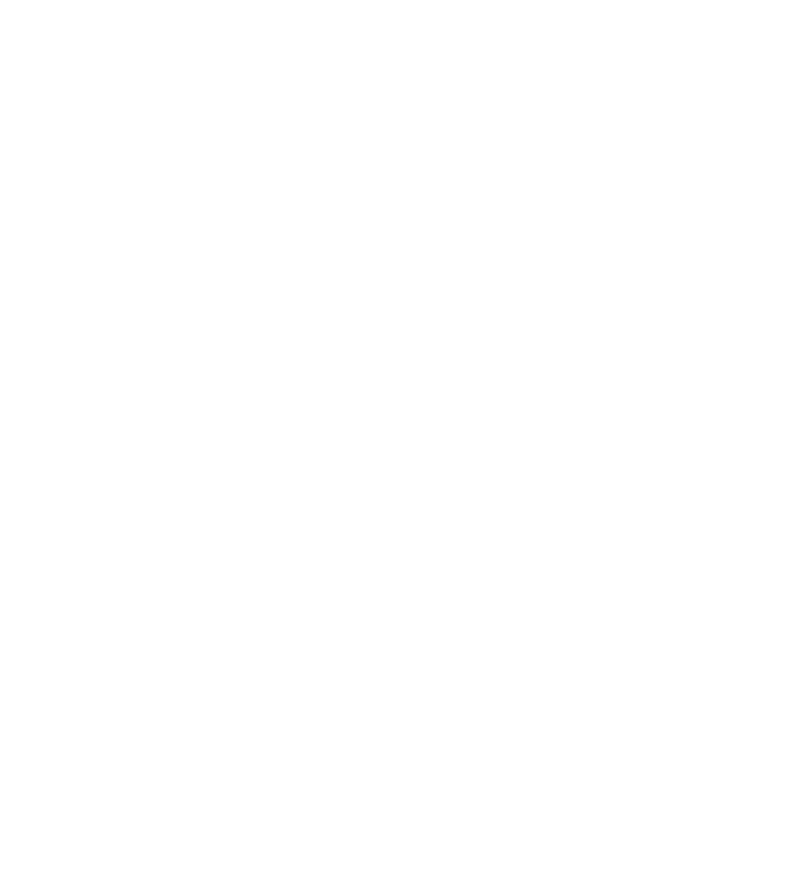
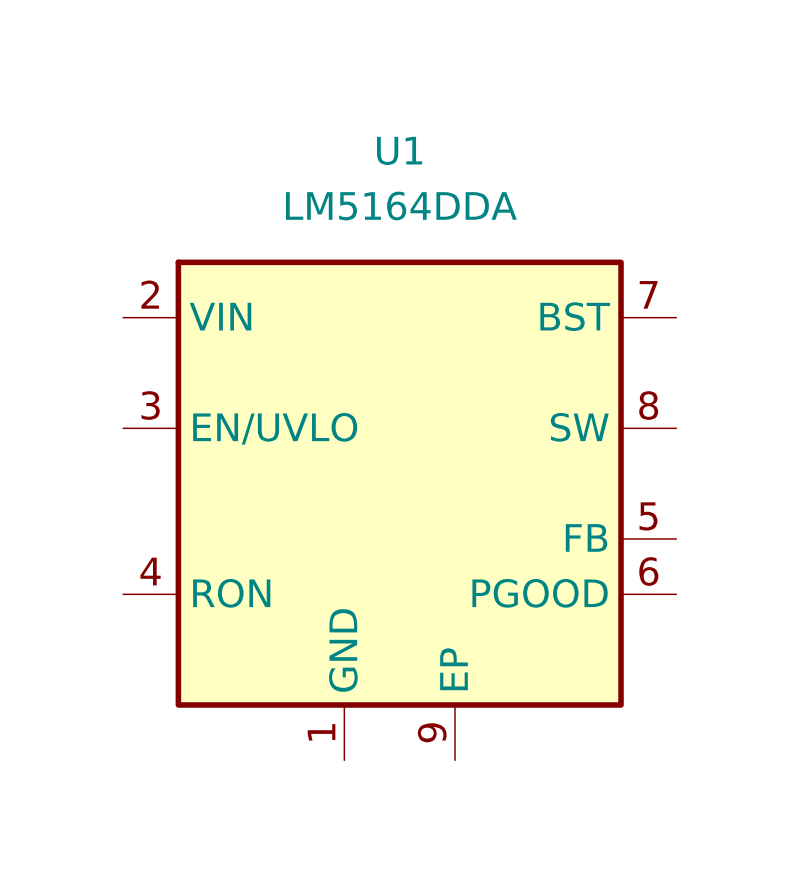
U1: none -> LM5164DDA (399, 509)

